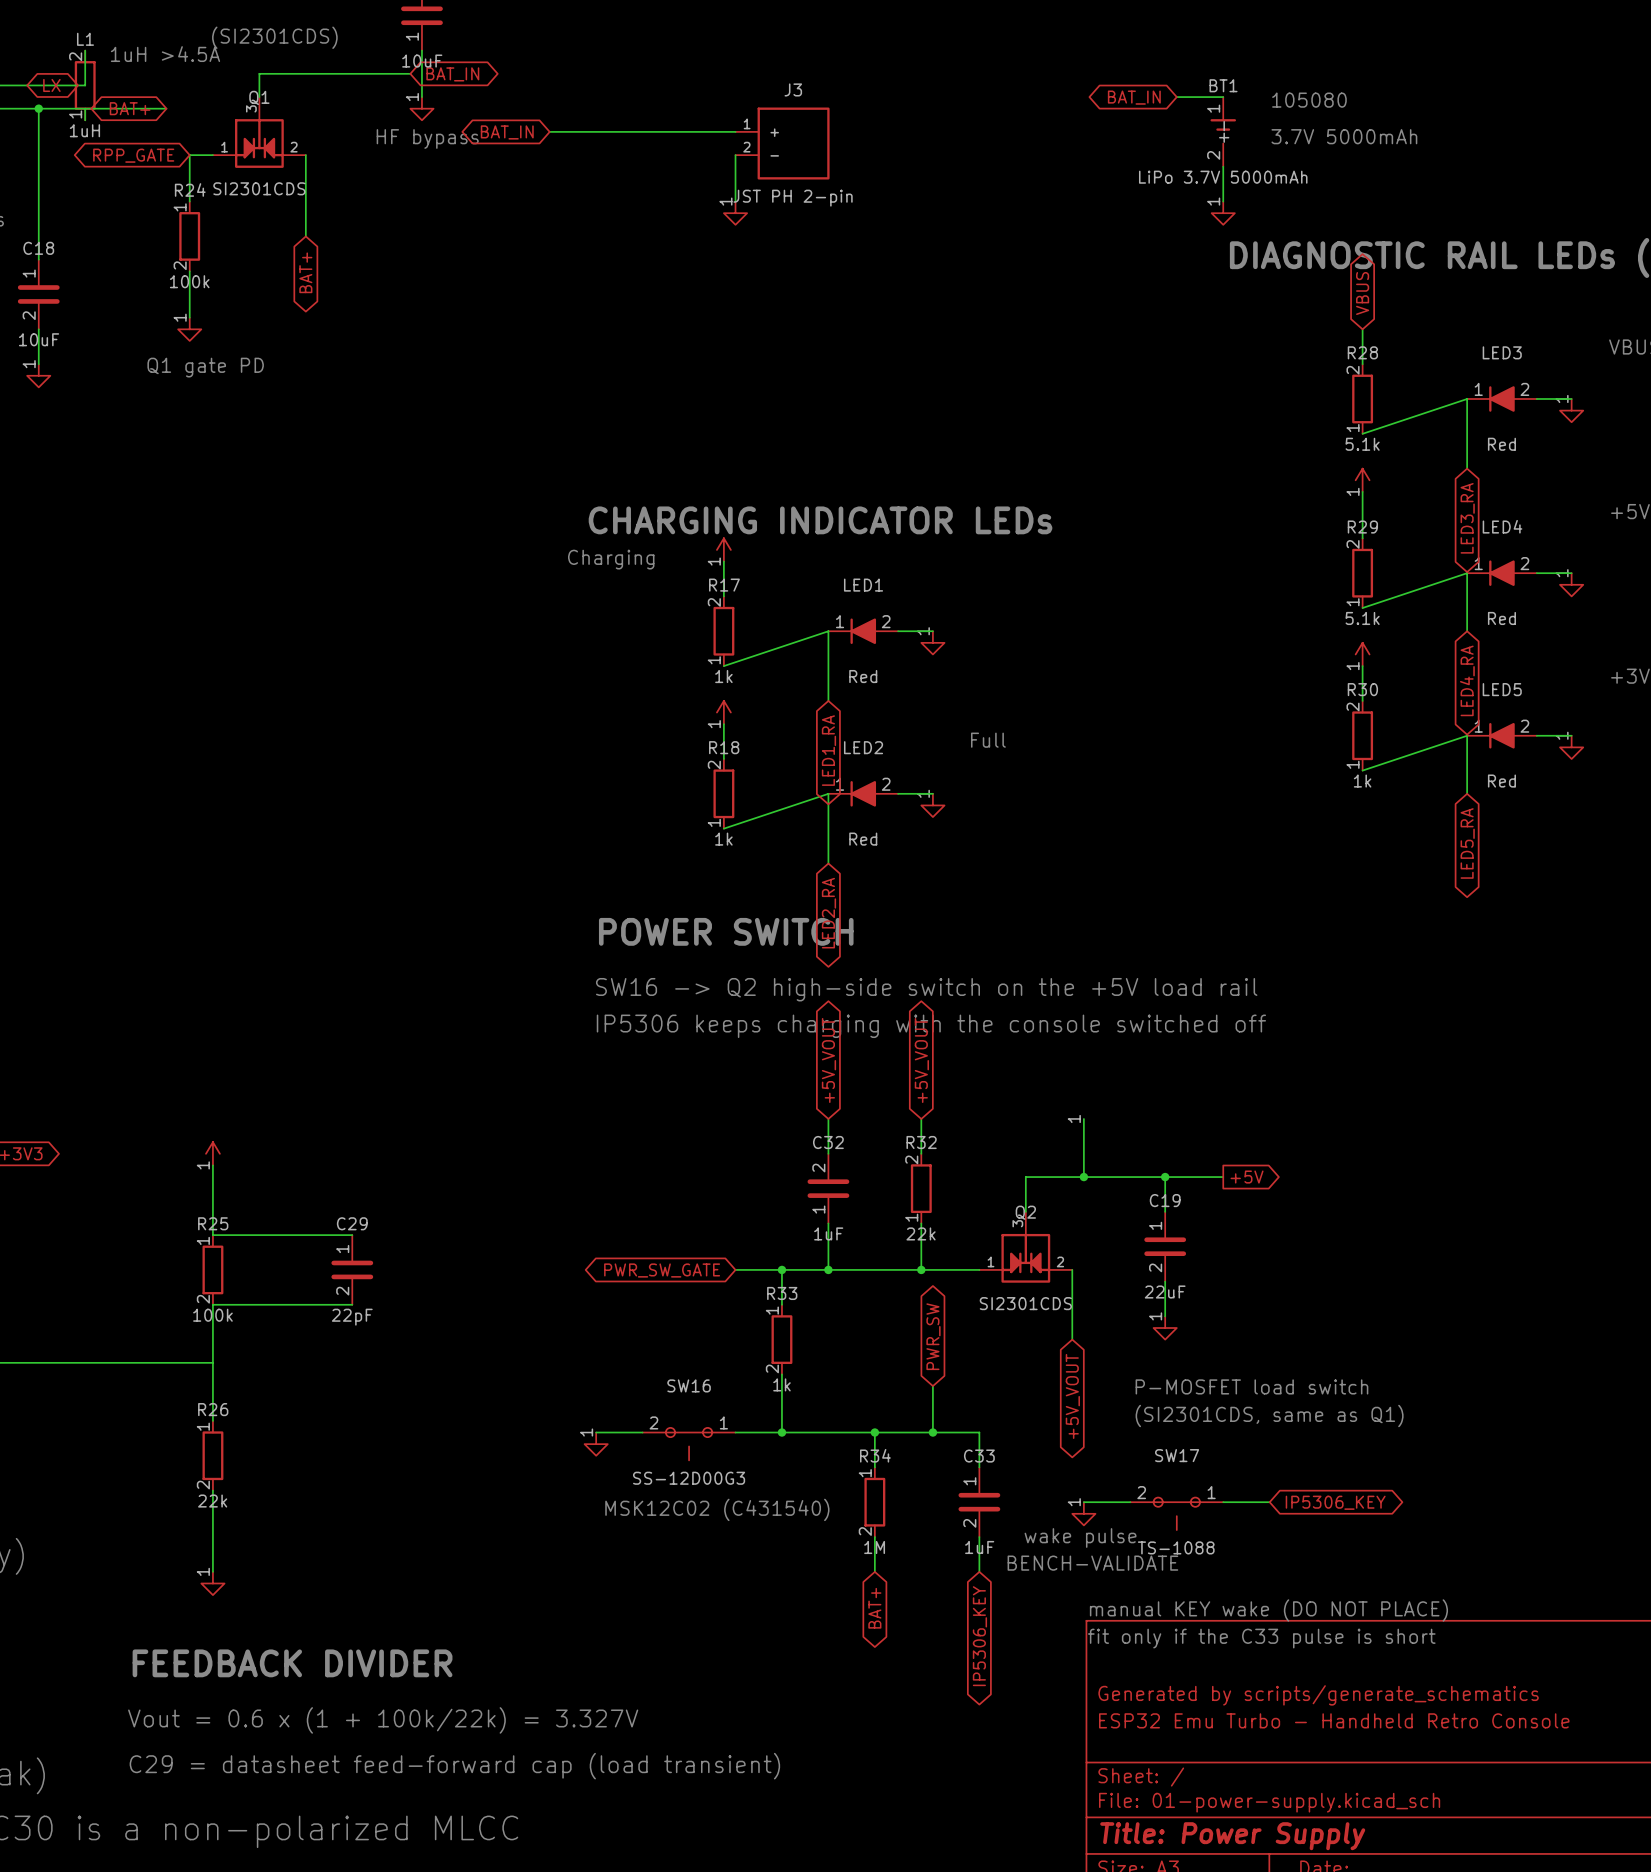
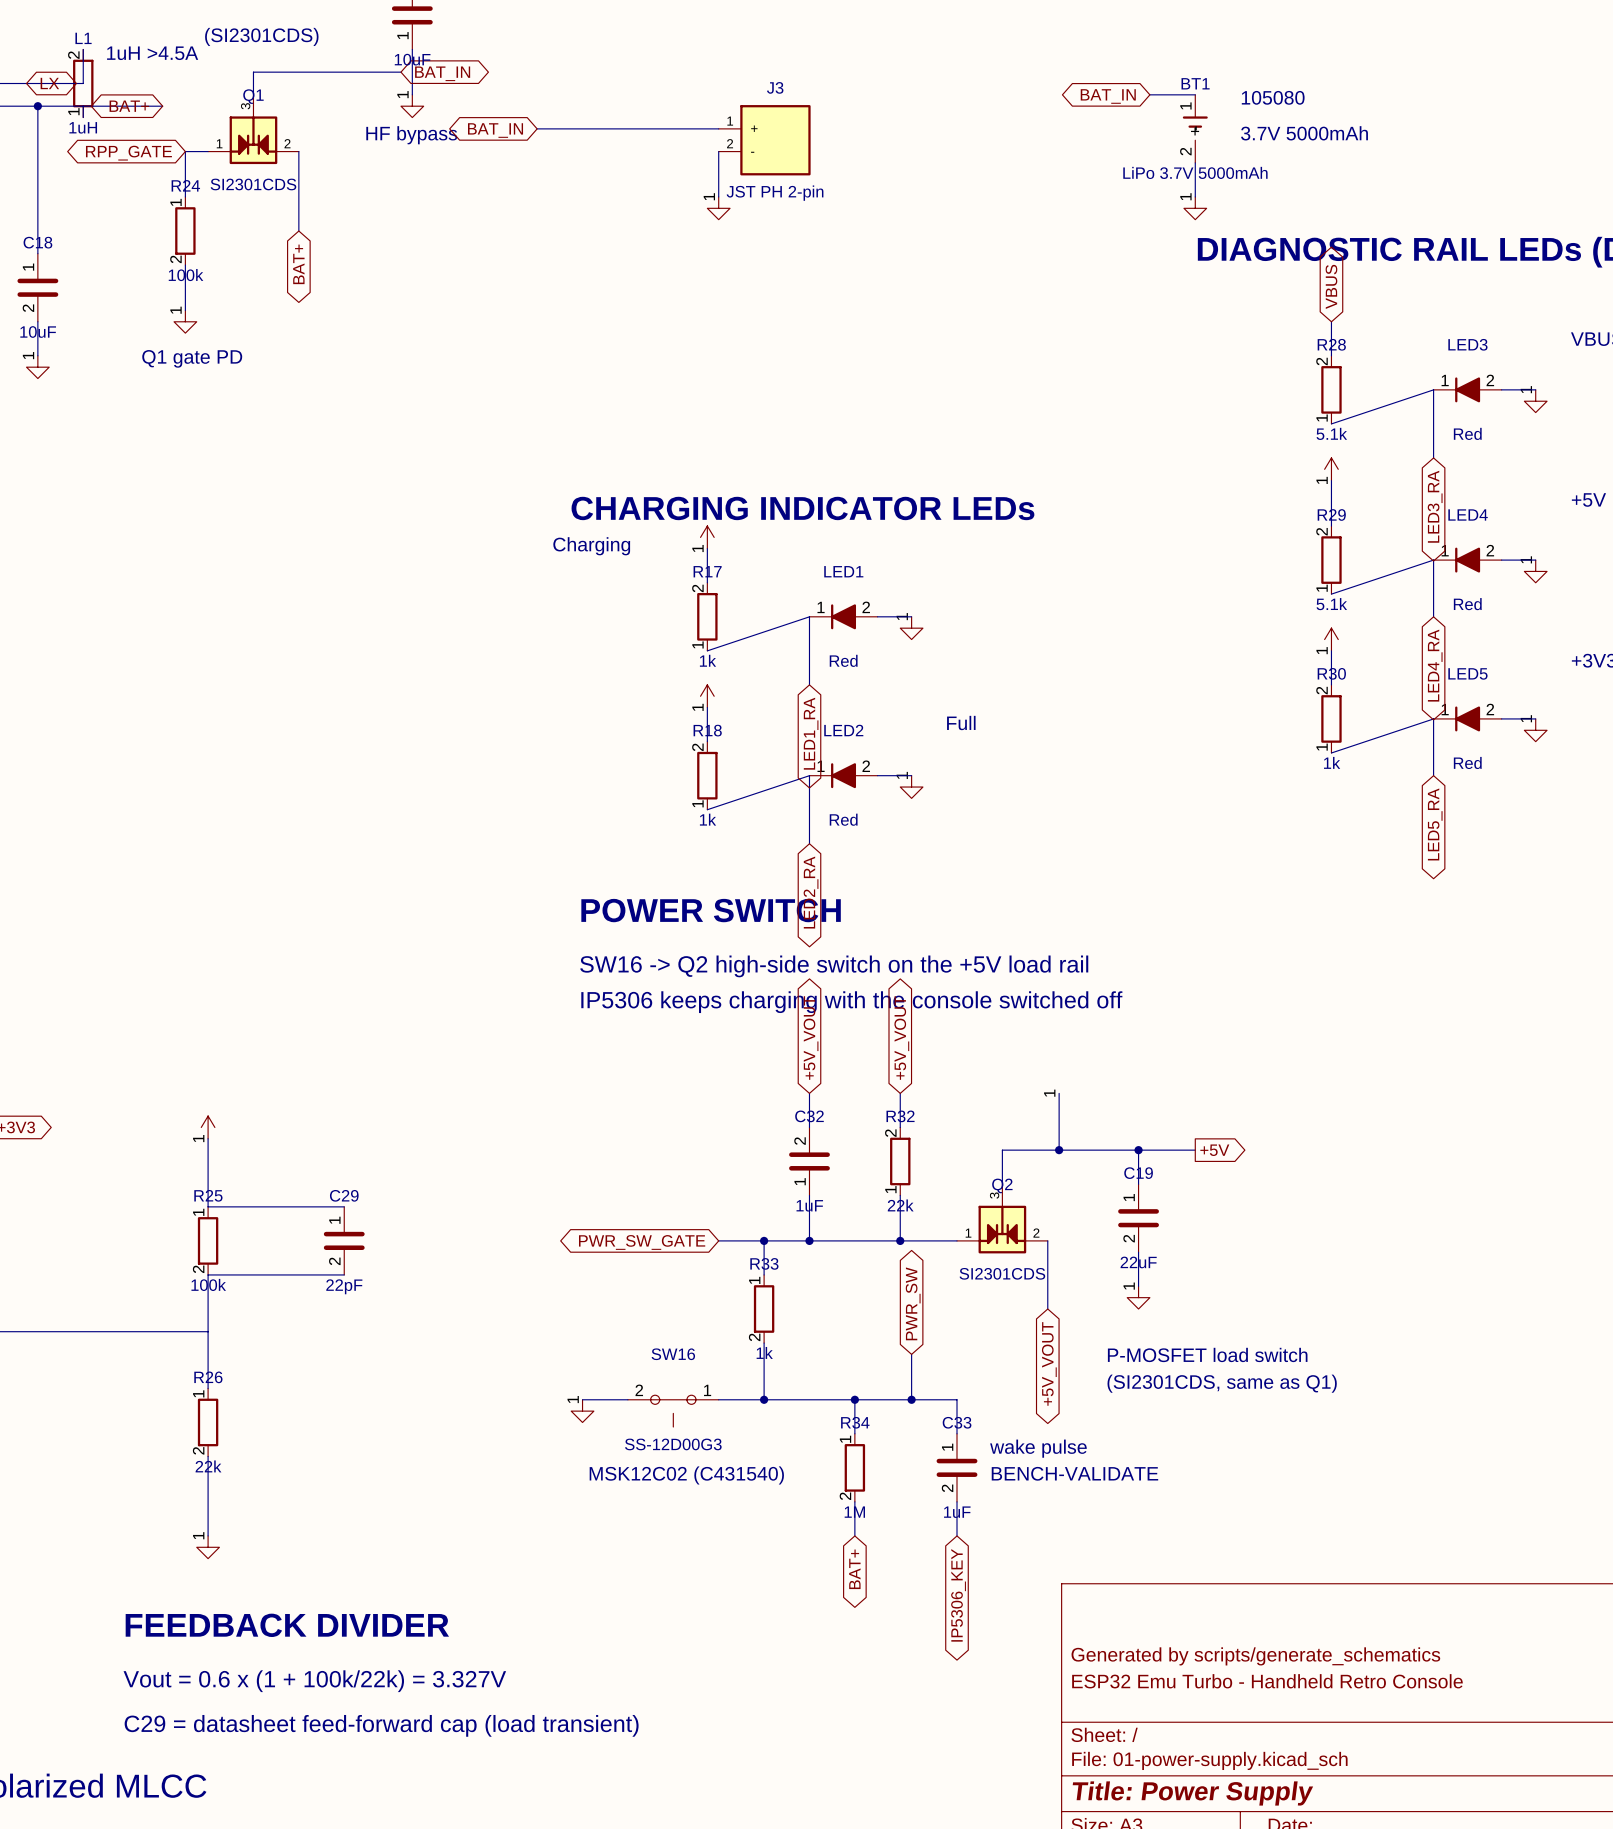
wire: (1083, 1502) (1130, 1502) -> none
wire: (1223, 1502) (1269, 1502) -> none
global label: IP5306_KEY (1335, 1502) -> none
power symbol: (1083, 1513) -> none
SW17: TS-1088 (1176, 1513) -> none
text position: wake pulse (1080, 1537) -> wake pulse (1038, 1448)
text position: BENCH-VALIDATE (1092, 1563) -> BENCH-VALIDATE (1074, 1473)
text: manual KEY wake (DO NOT PLACE) (1268, 1610) -> none
text: fit only if the C33 pulse is short (1261, 1638) -> none

